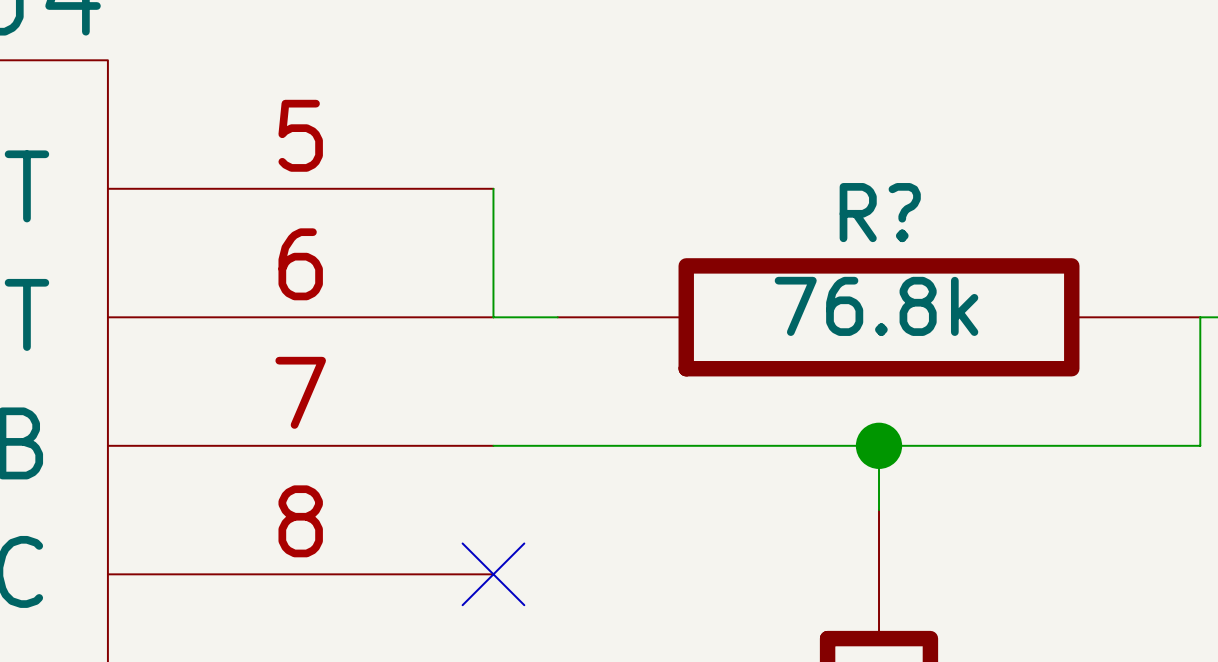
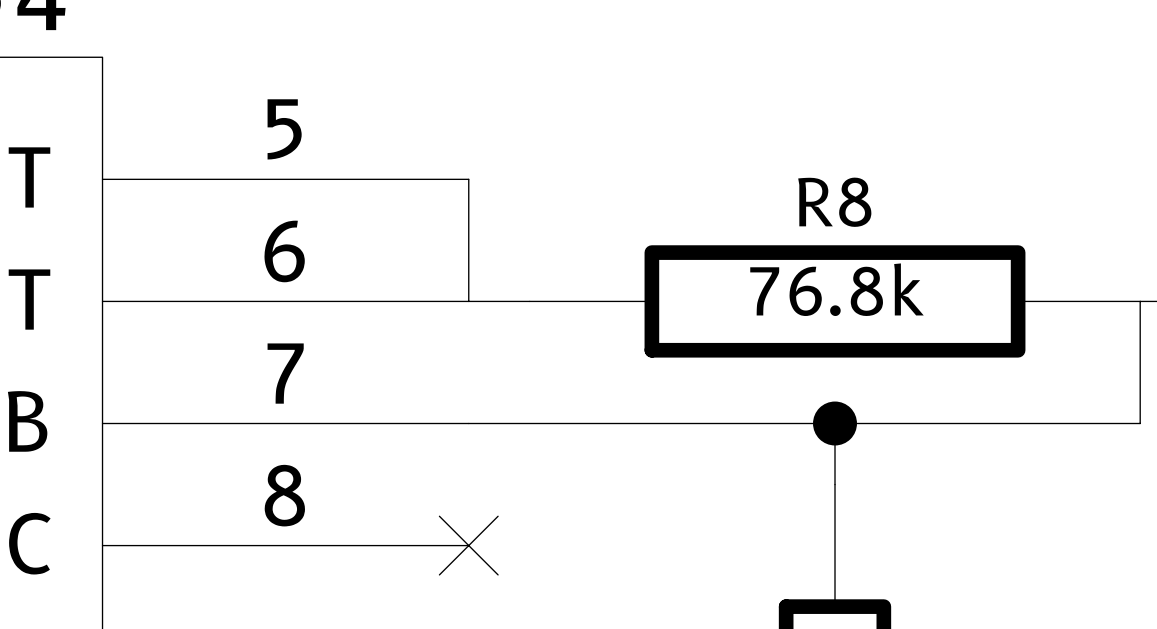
R? name: R? (880, 212) -> R8 (834, 202)

